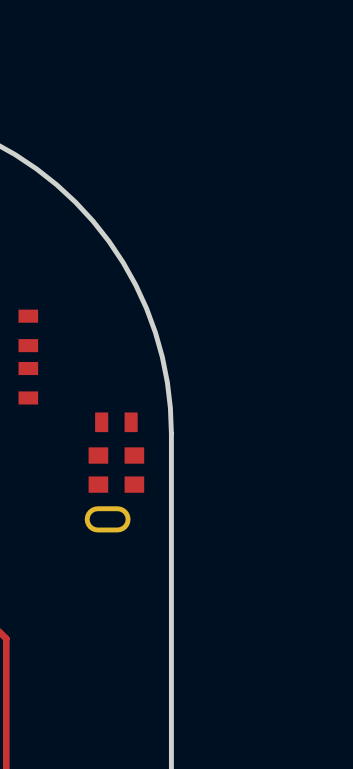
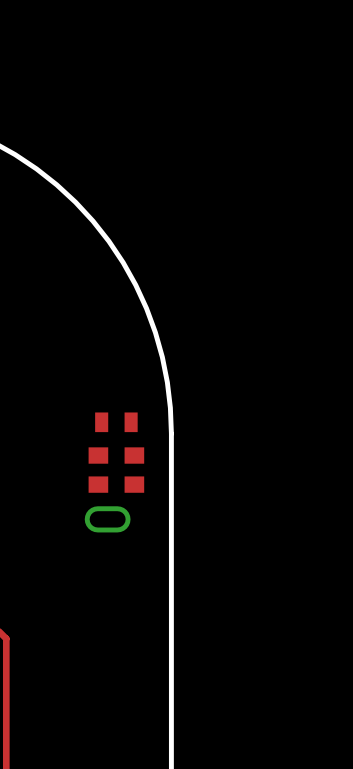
part: (28, 330) -> none
part: (28, 383) -> none

